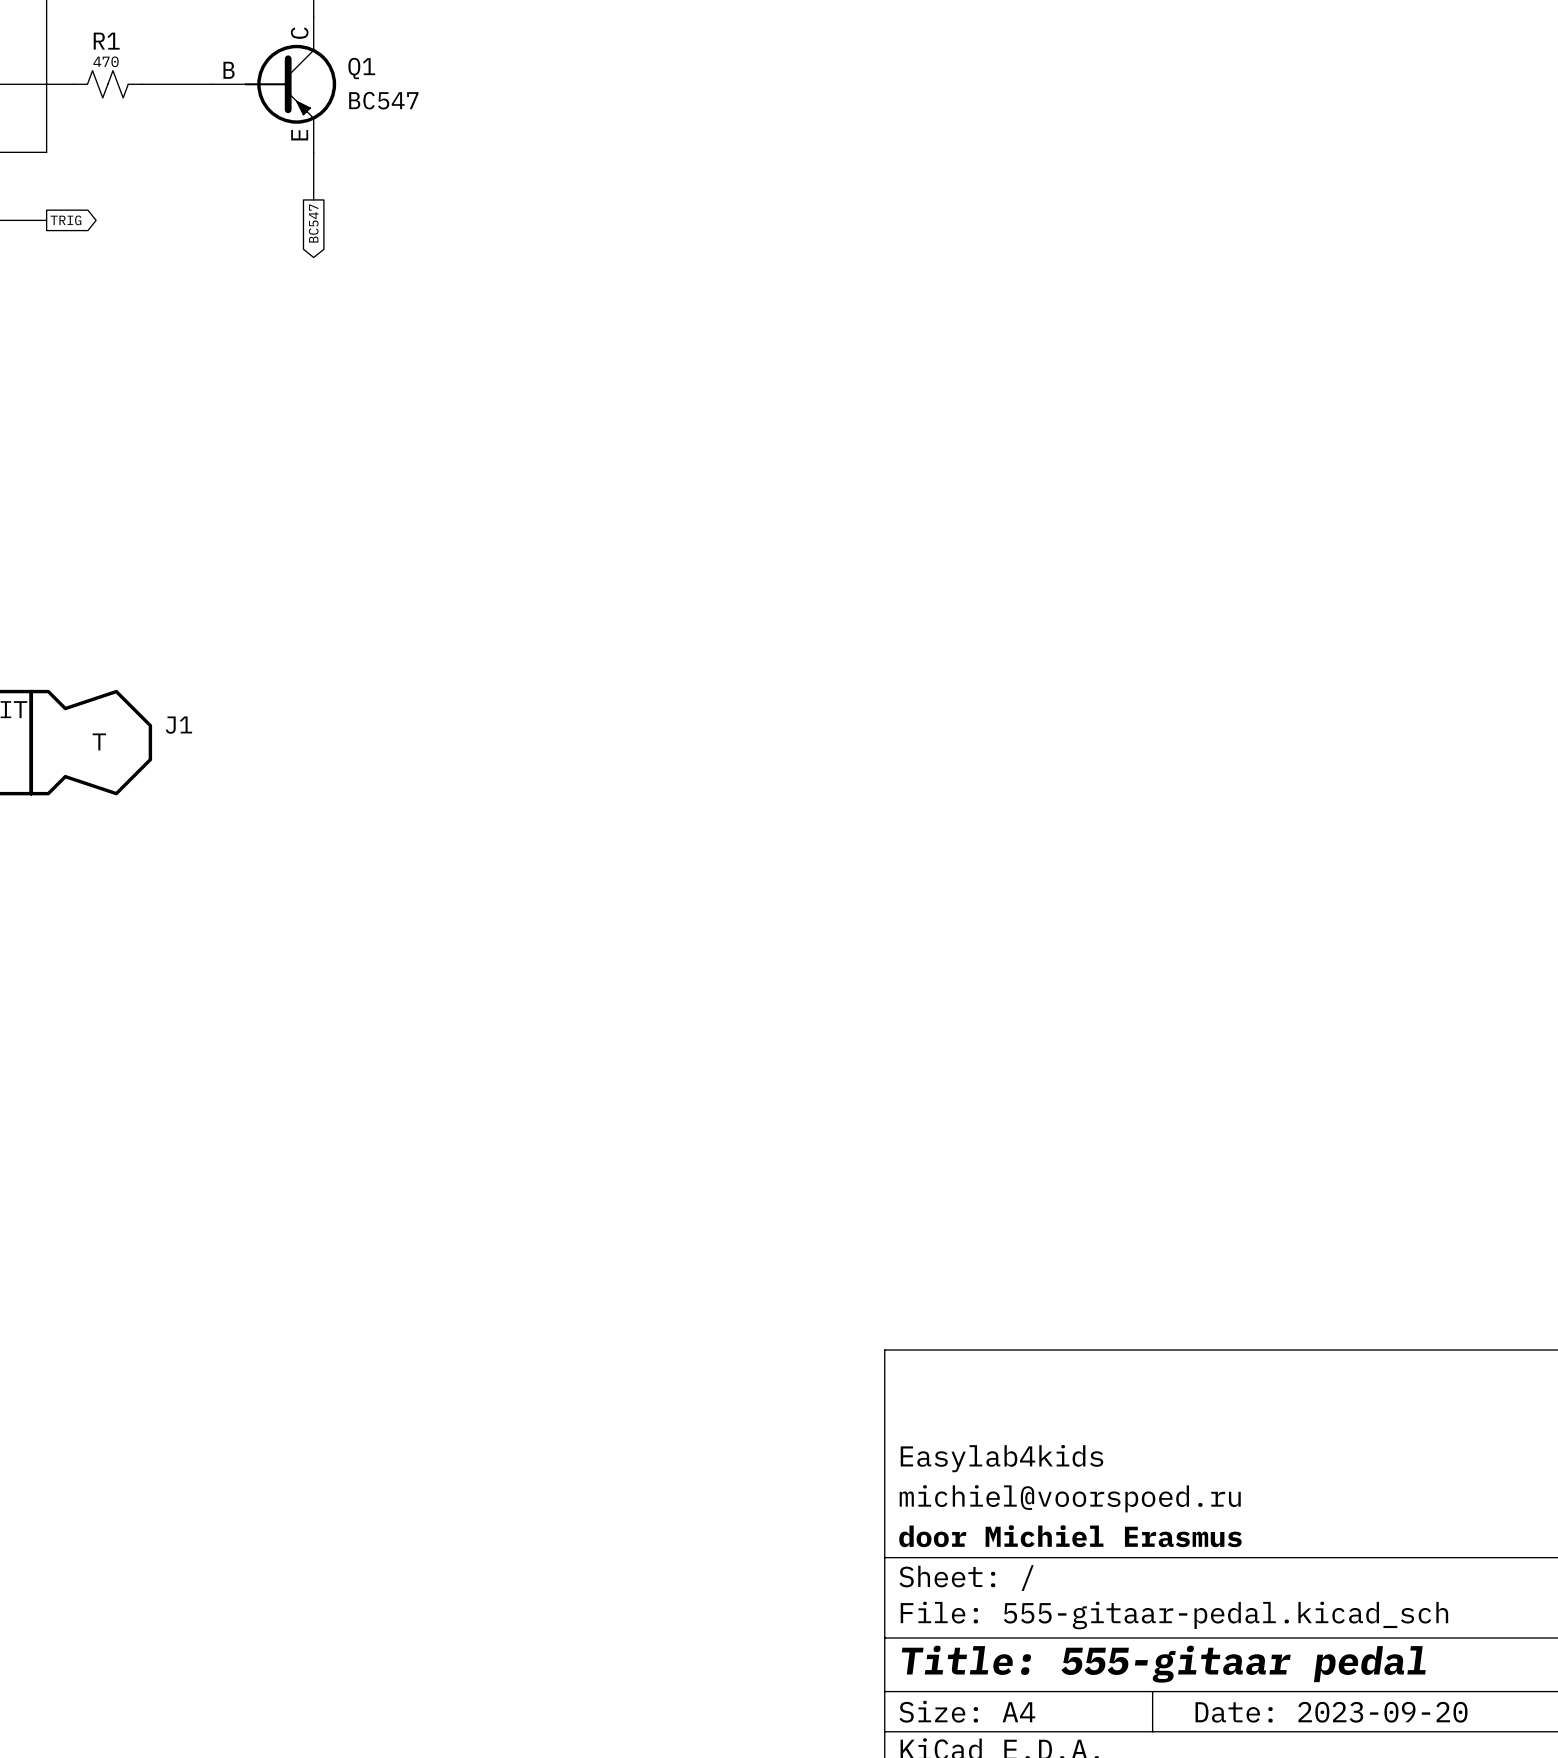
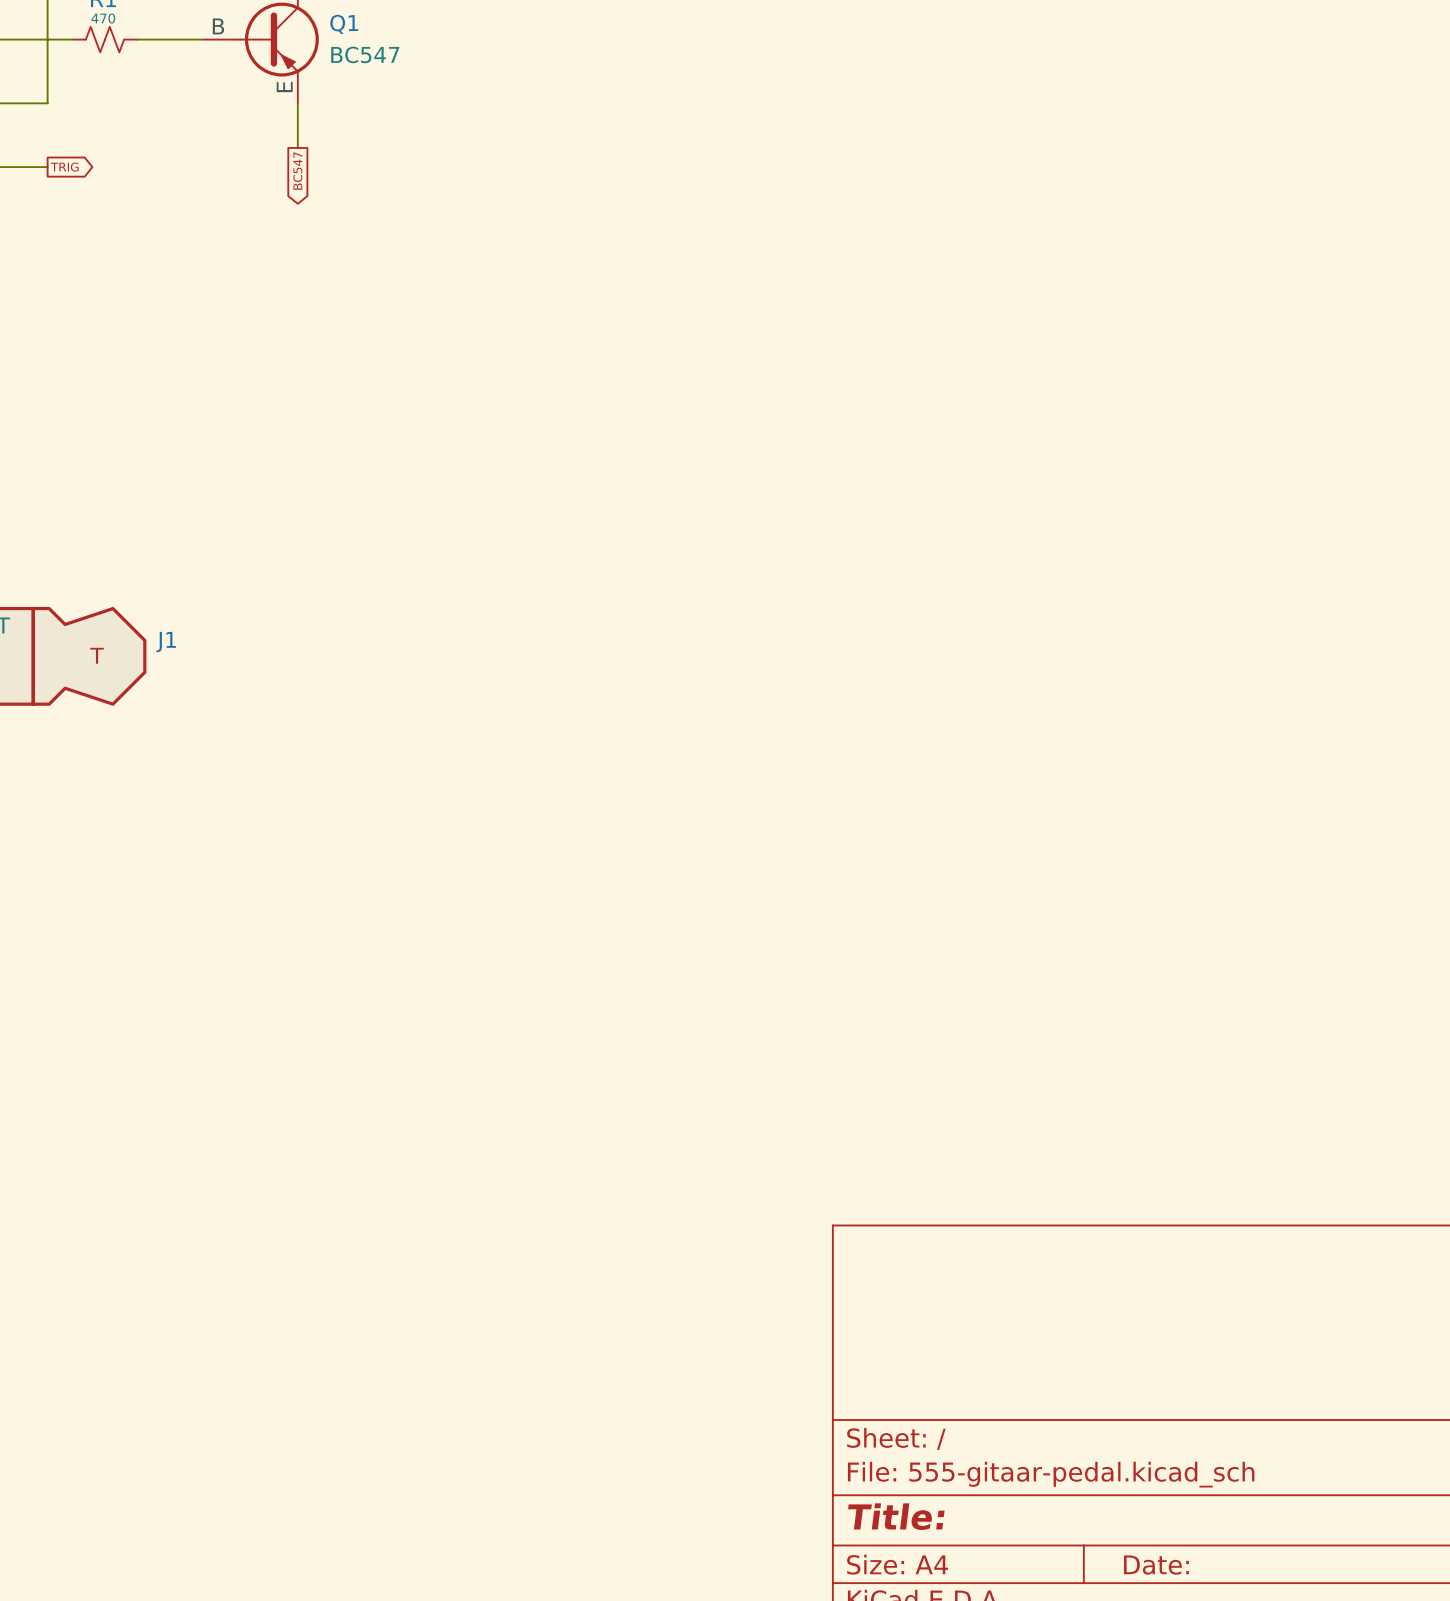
title block: Easylab4kids (1001, 1458) -> none
title block: michiel@voorspoed.ru (1070, 1498) -> none
title block: door Michiel Erasmus (1070, 1536) -> none
title block: Title: 555-gitaar pedal (1163, 1664) -> Title: (896, 1516)
title block: Date: 2023-09-20 (1331, 1712) -> Date: (1156, 1565)

